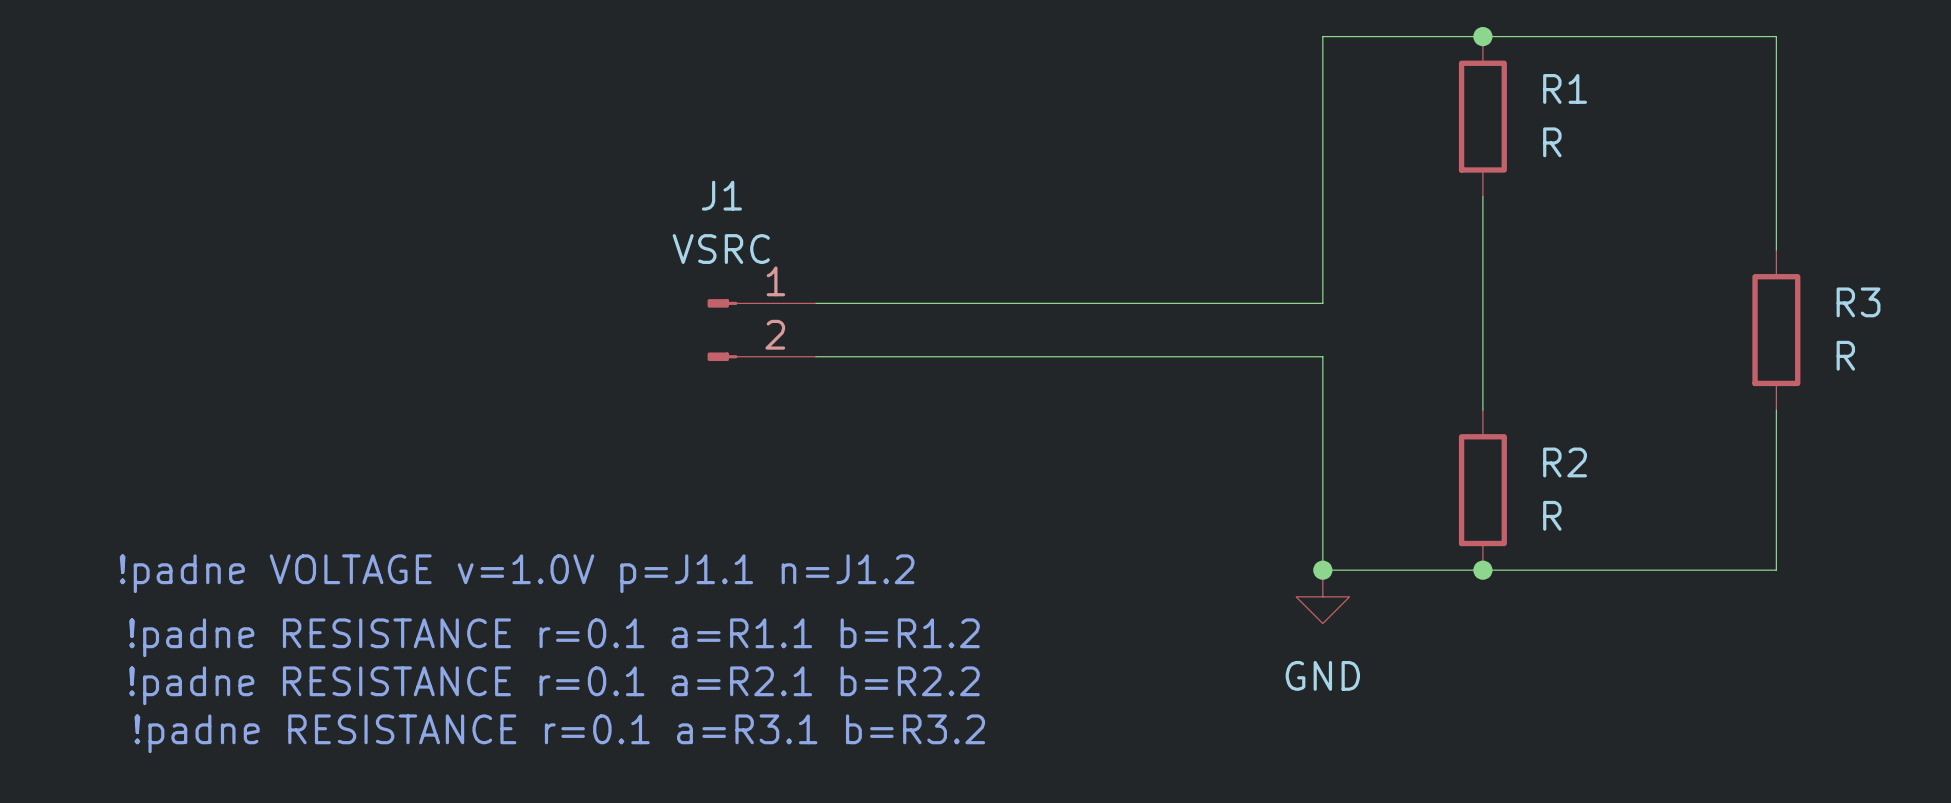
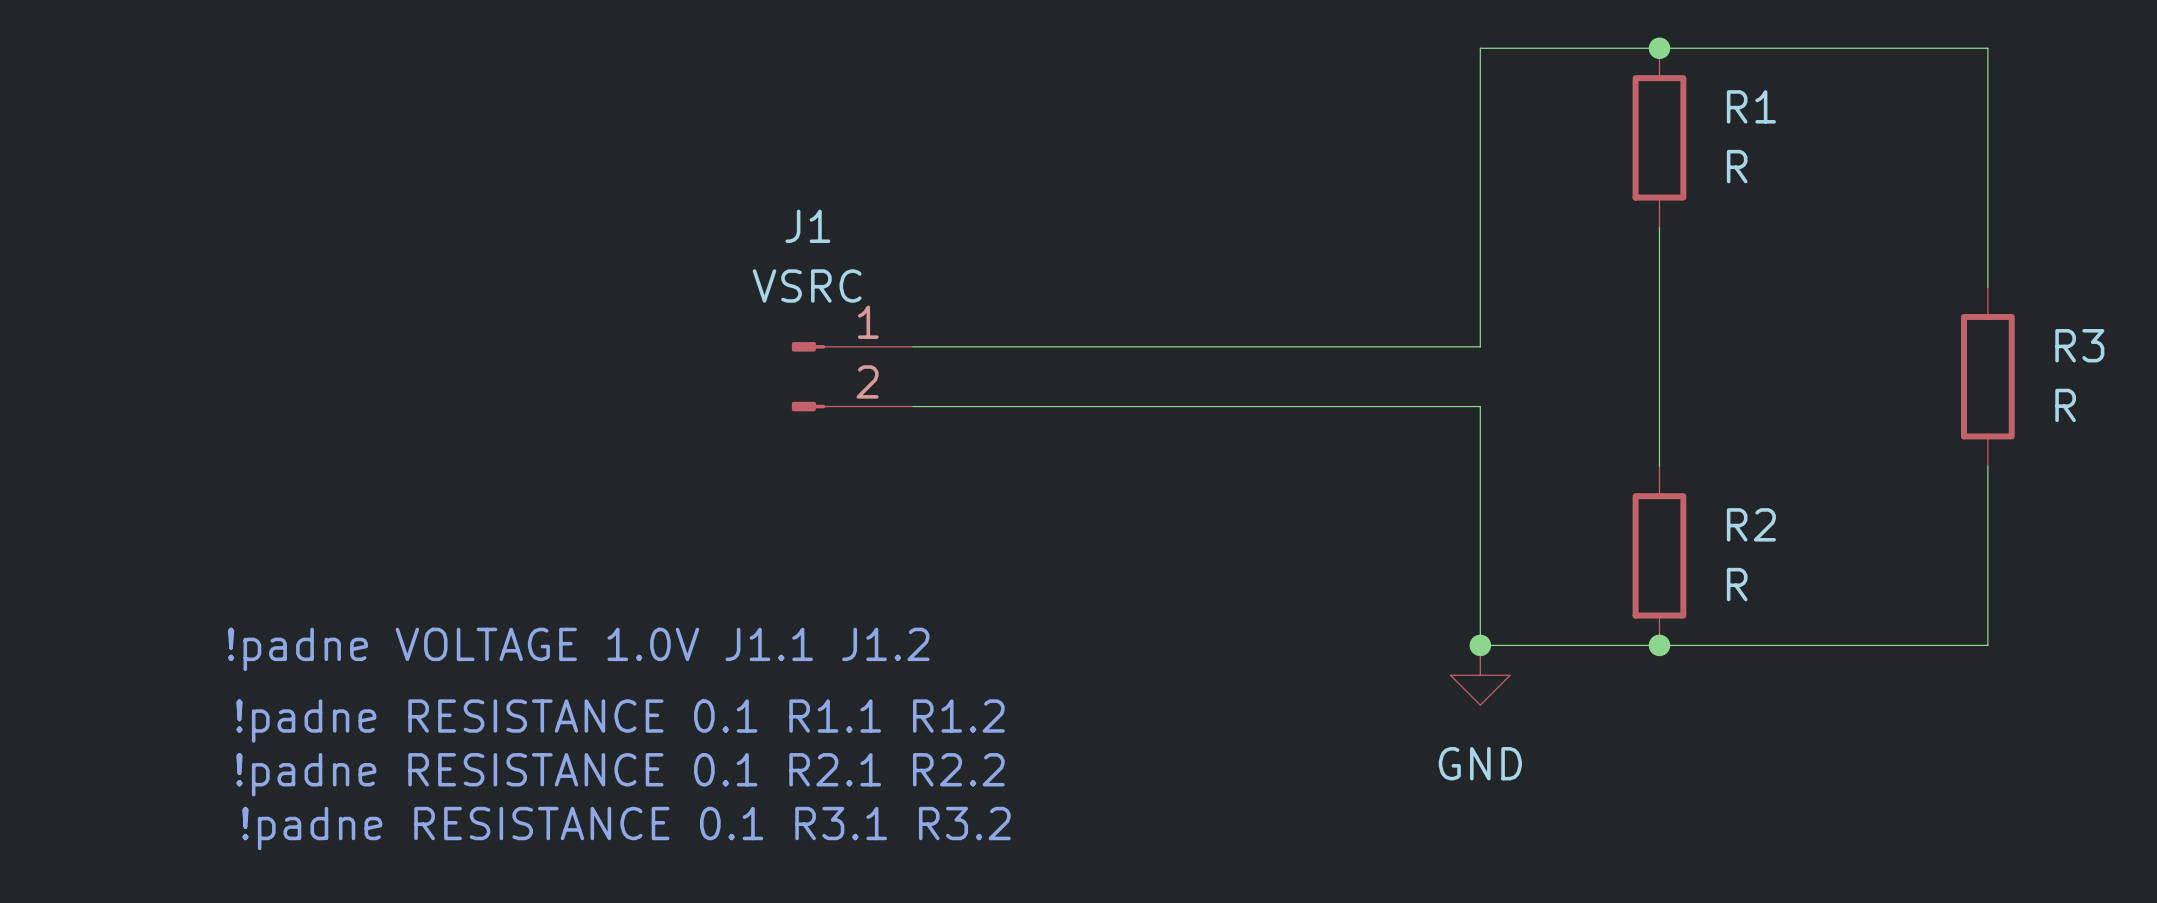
text: !padne VOLTAGE v=1.0V p=J1.1 n=J1.2 (517, 573) -> !padne VOLTAGE 1.0V J1.1 J1.2 (578, 649)
text: !padne RESISTANCE r=0.1 a=R1.1 b=R1.2 (554, 637) -> !padne RESISTANCE 0.1 R1.1 R1.2 (620, 721)
text: !padne RESISTANCE r=0.1 a=R2.1 b=R2.2 (554, 685) -> !padne RESISTANCE 0.1 R2.1 R2.2 (620, 774)
text: !padne RESISTANCE r=0.1 a=R3.1 b=R3.2 (559, 733) -> !padne RESISTANCE 0.1 R3.1 R3.2 (626, 828)

